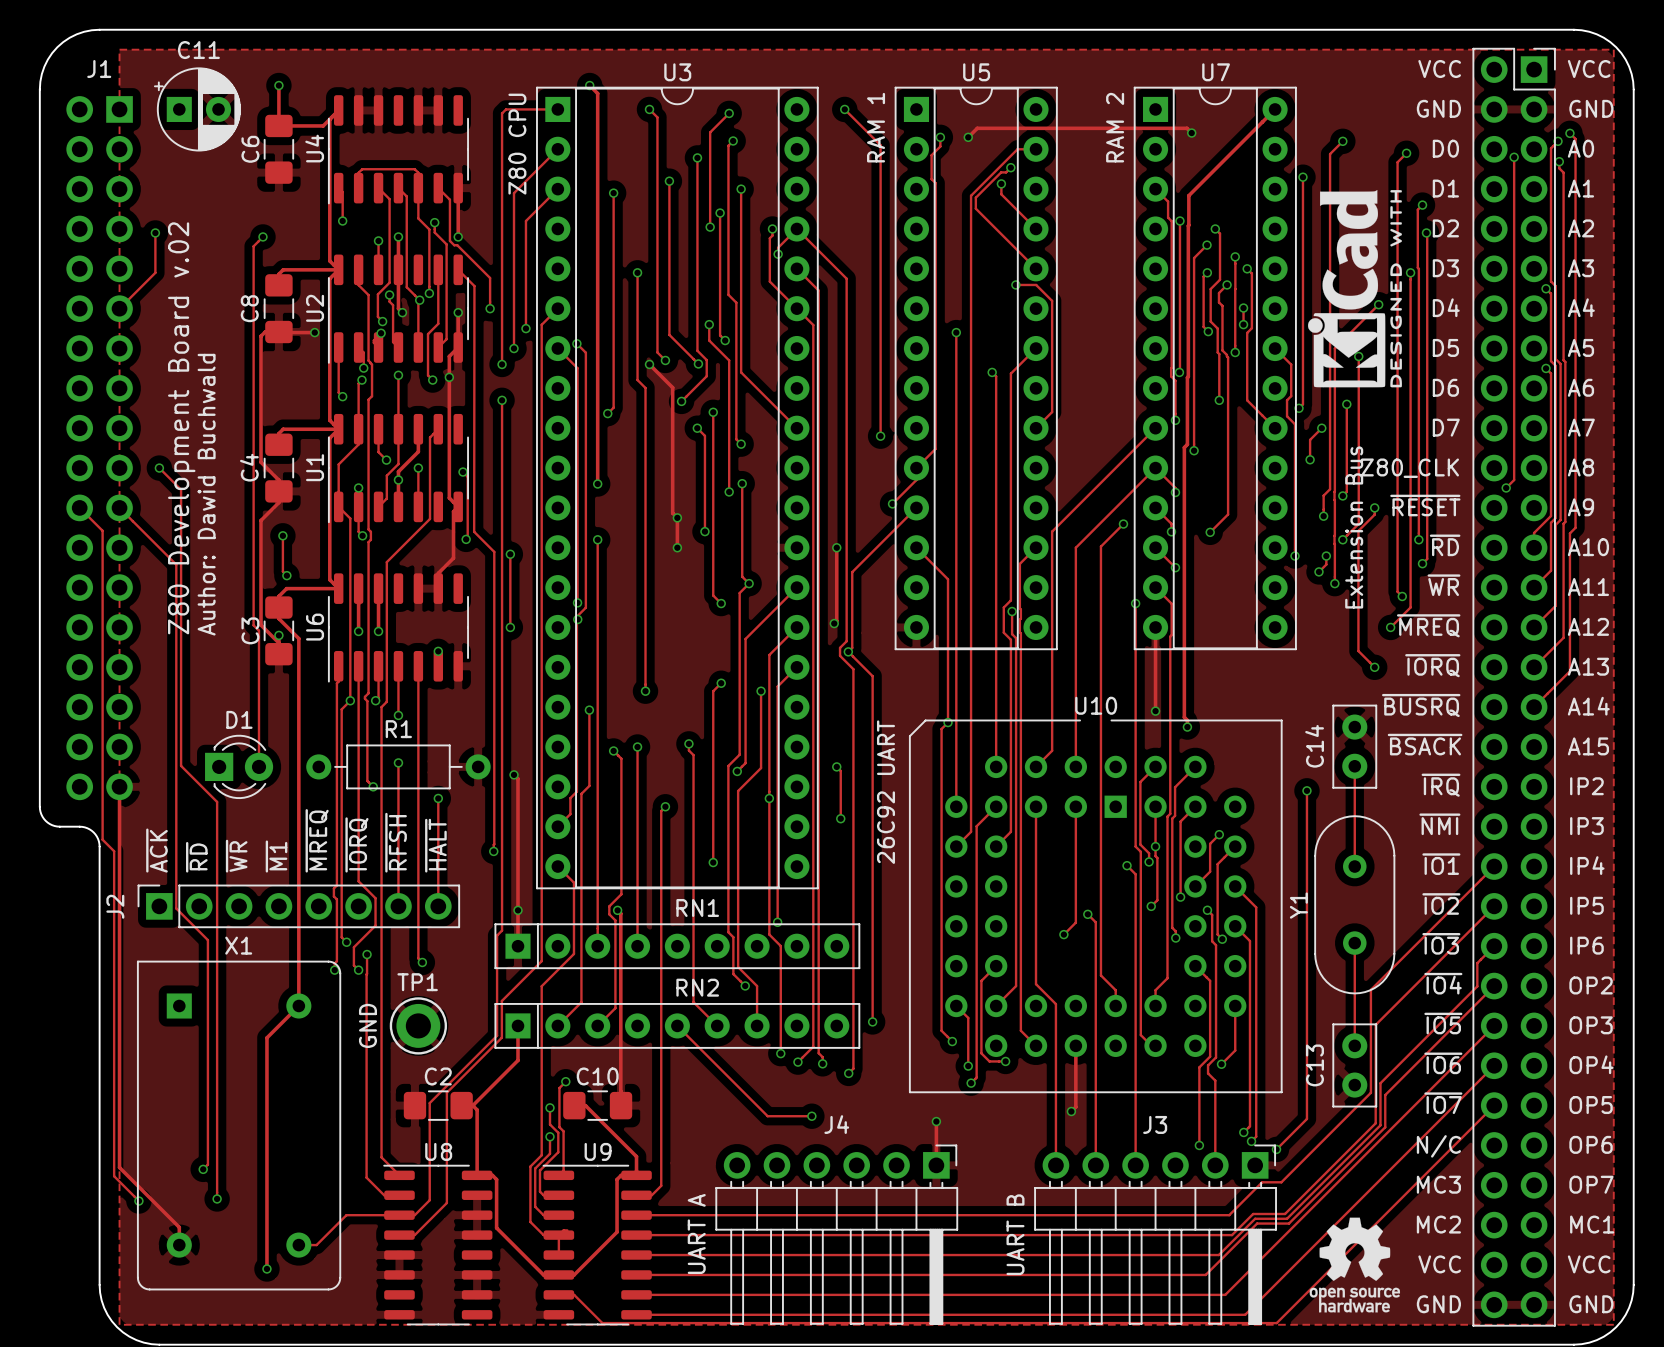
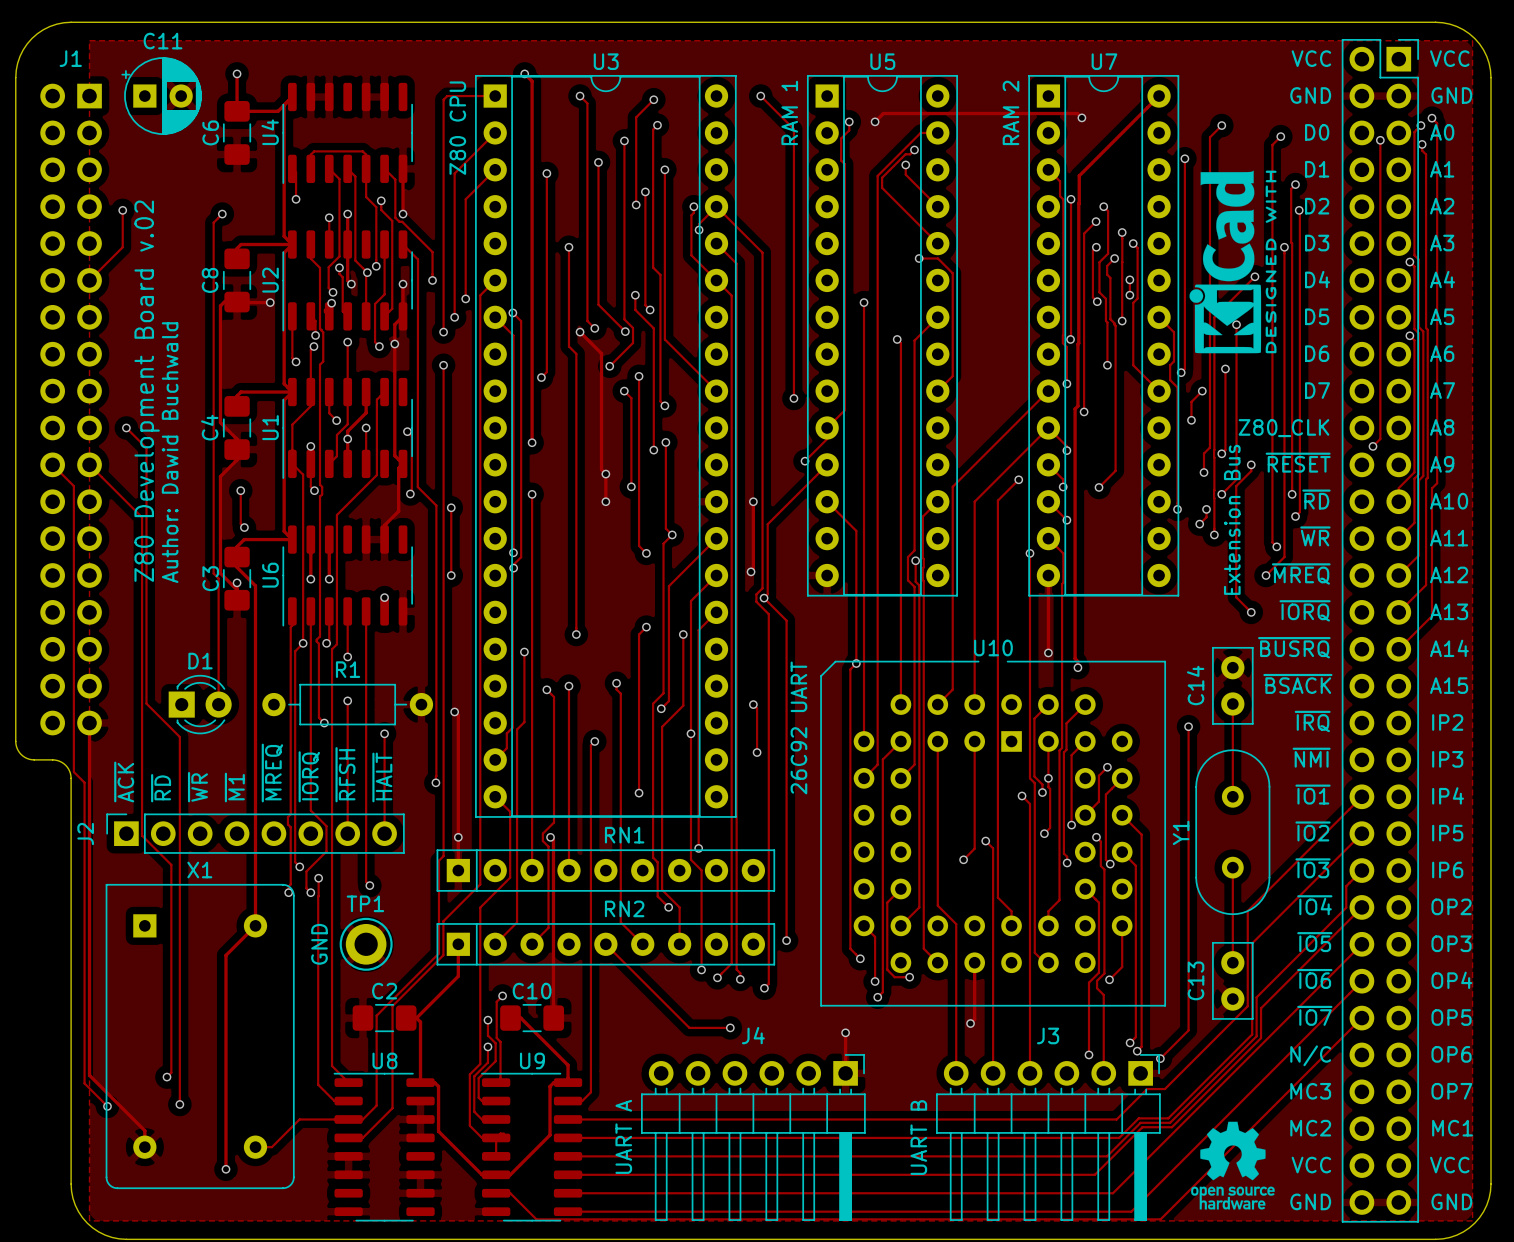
text position: Extension Bus (1354, 527) -> Extension Bus (1232, 519)

